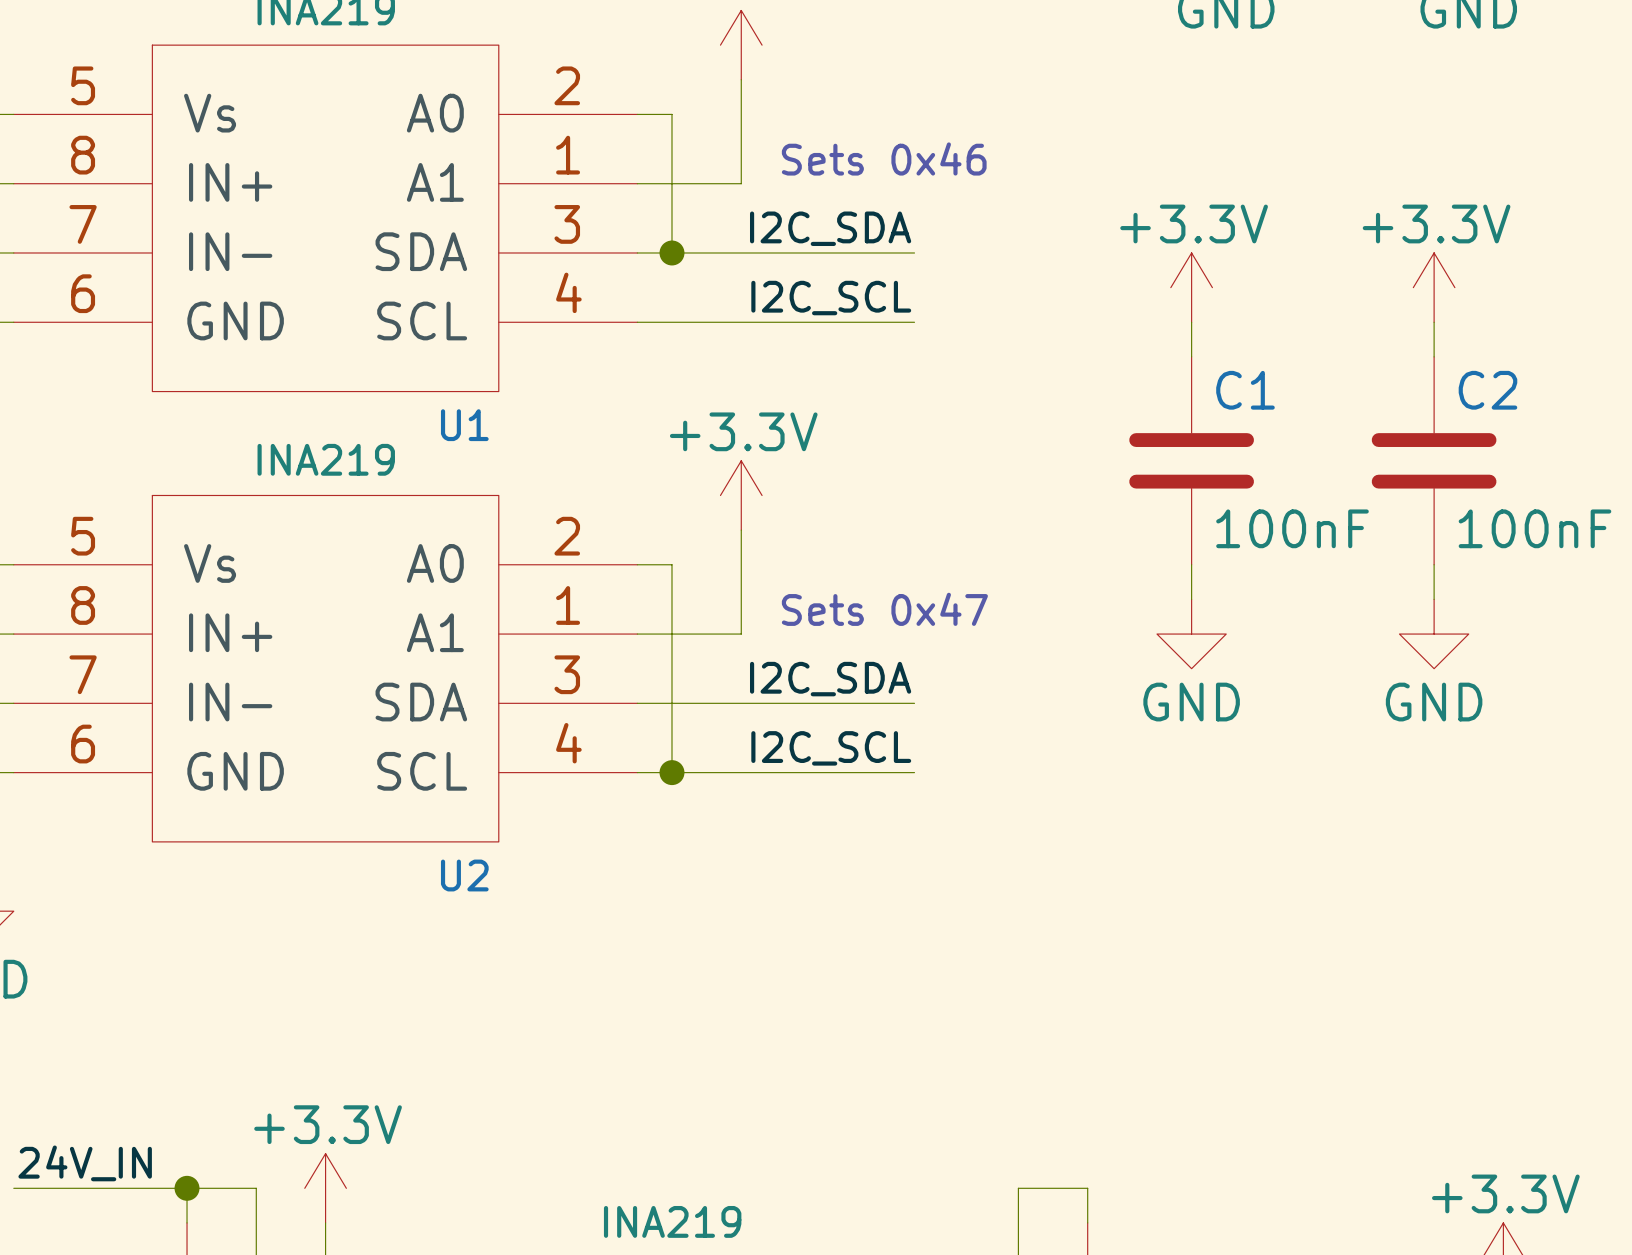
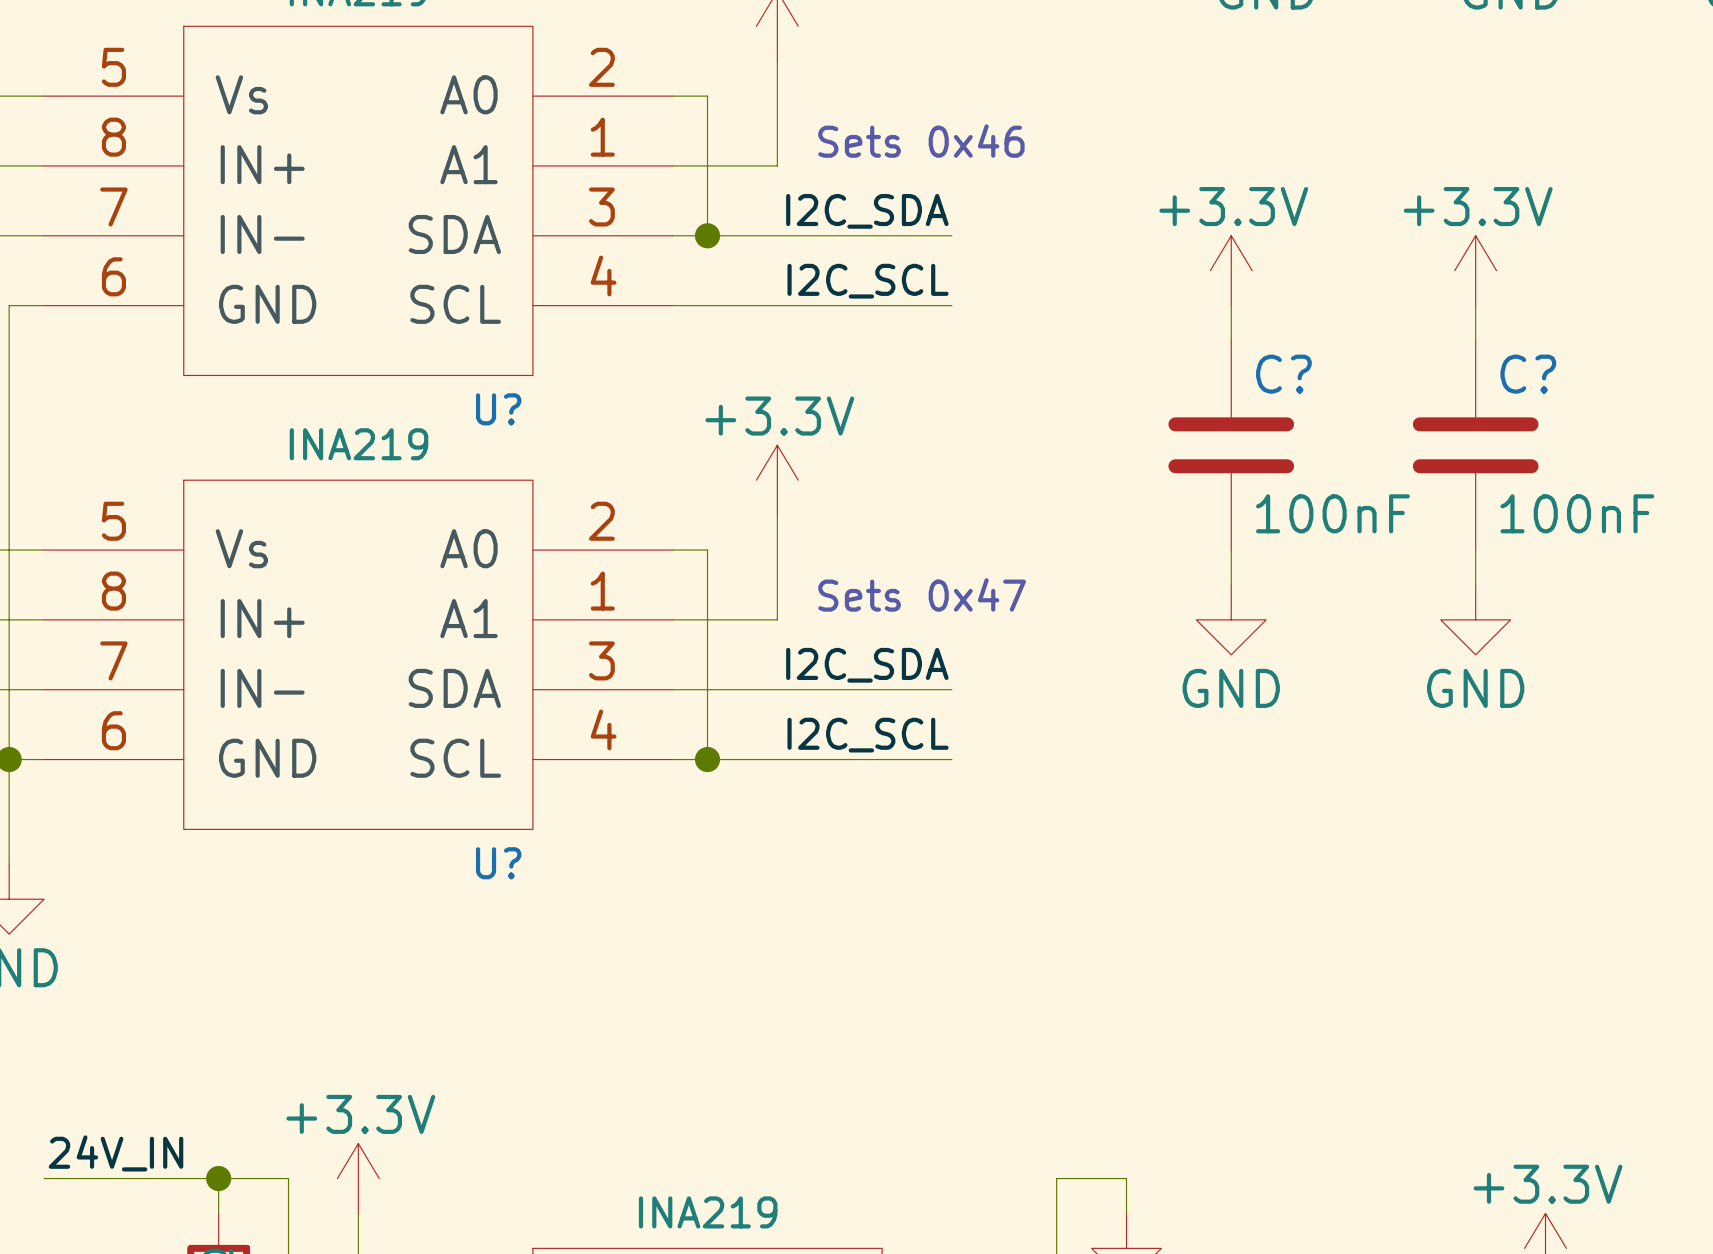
C1 name: C1 (1245, 390) -> C? (1283, 374)
C2 name: C2 (1487, 390) -> C? (1528, 374)
U1 name: U1 (464, 425) -> U? (498, 409)
U2 name: U2 (464, 875) -> U? (498, 863)

